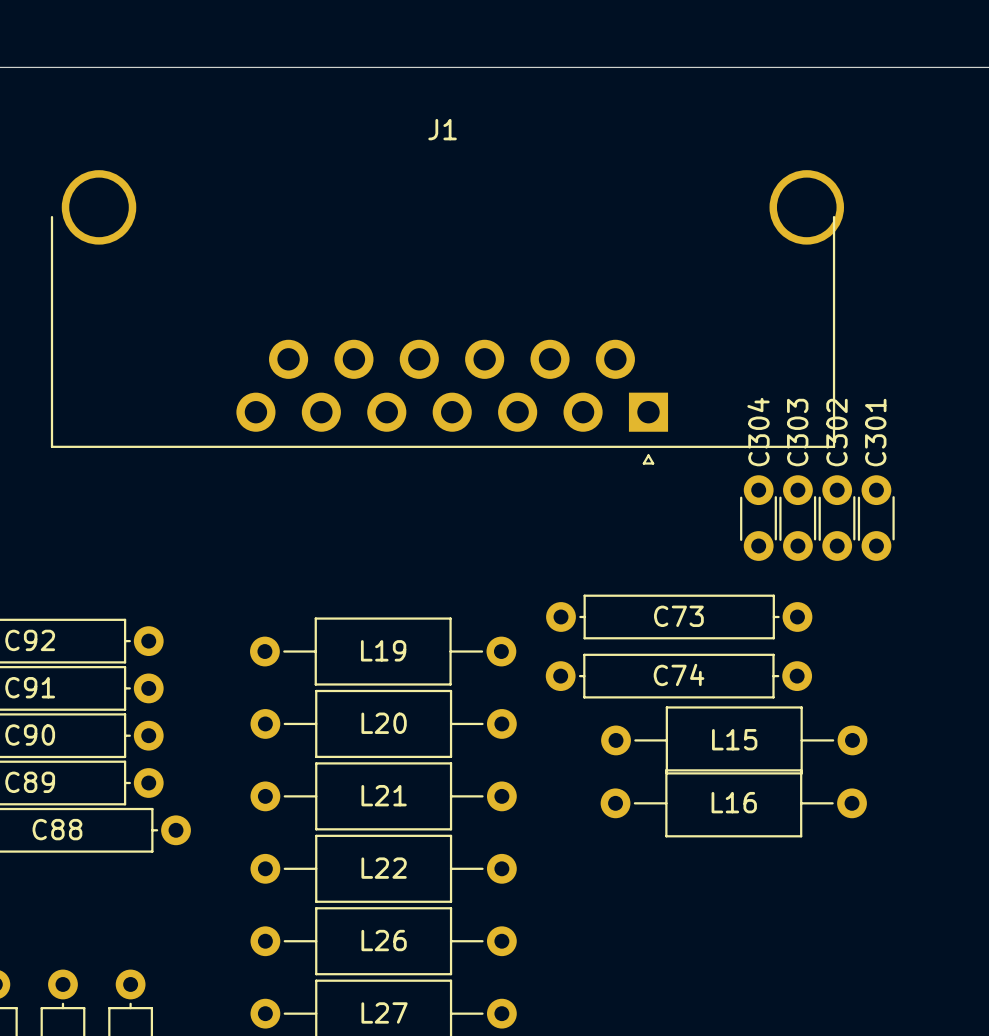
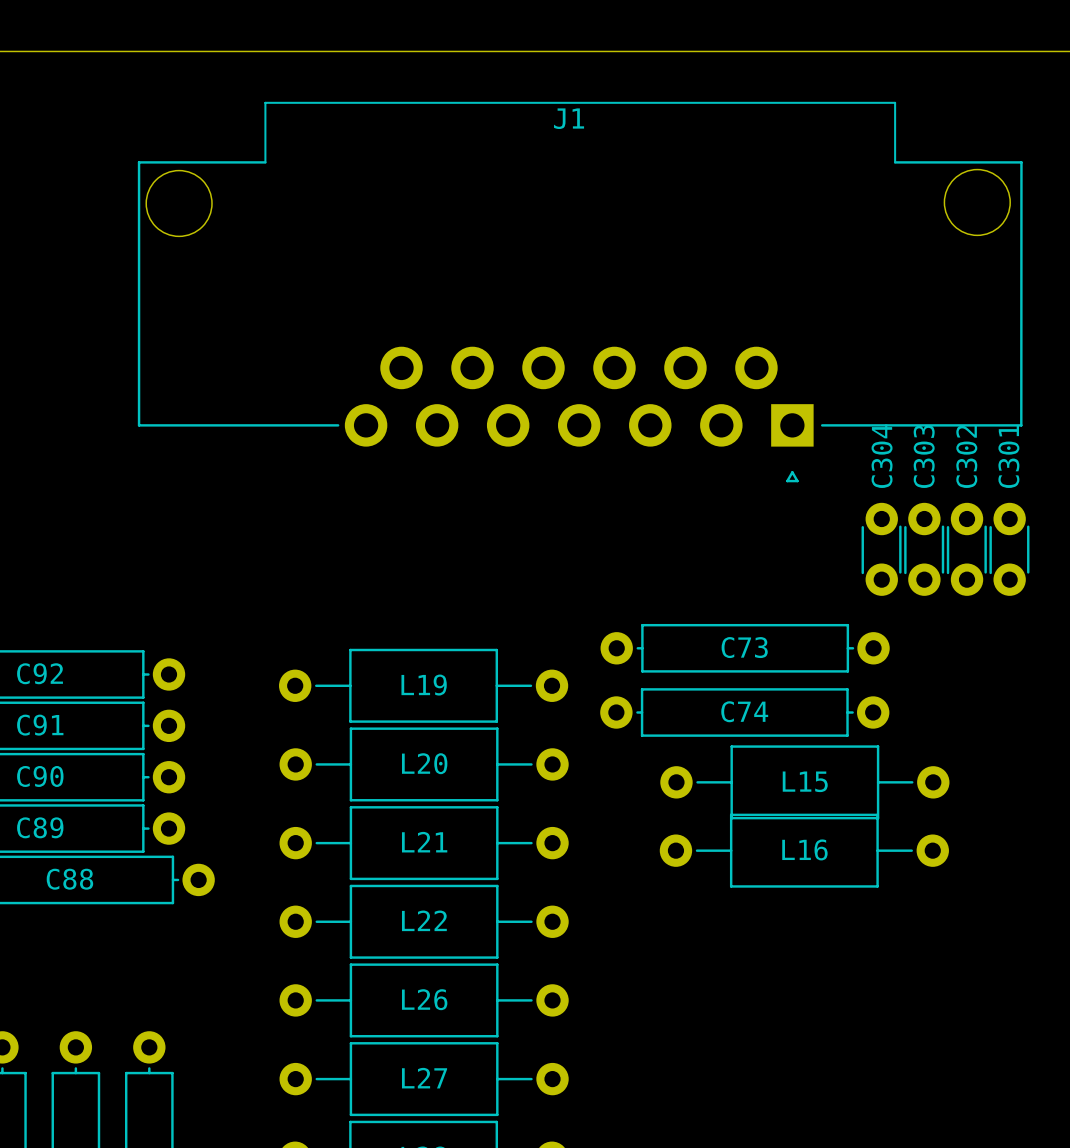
J1 footprint: [50, 170, 845, 465] -> [137, 101, 1023, 483]
C304 position: (758, 518) -> (881, 549)
C303 position: (797, 518) -> (924, 549)
C302 position: (837, 518) -> (966, 549)
C301 position: (876, 518) -> (1009, 549)

